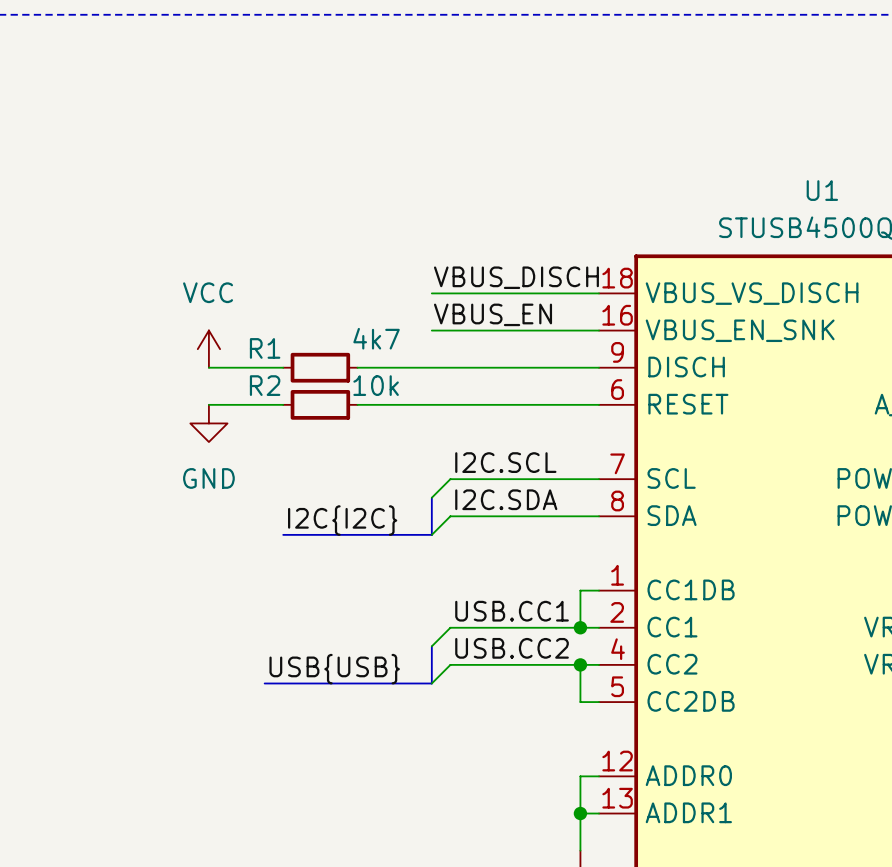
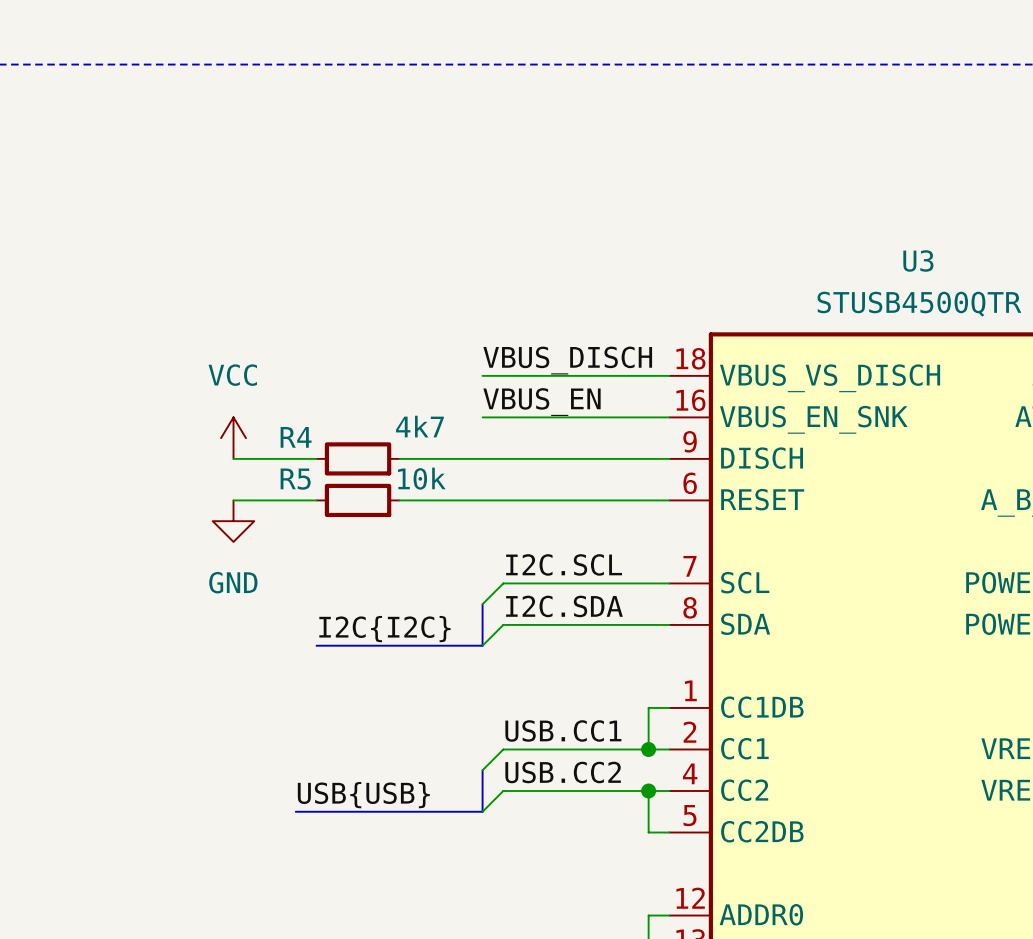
U1 name: U1 (822, 190) -> U3 (918, 260)
R1 name: R1 (265, 348) -> R4 (296, 437)
R2 name: R2 (265, 385) -> R5 (295, 479)

